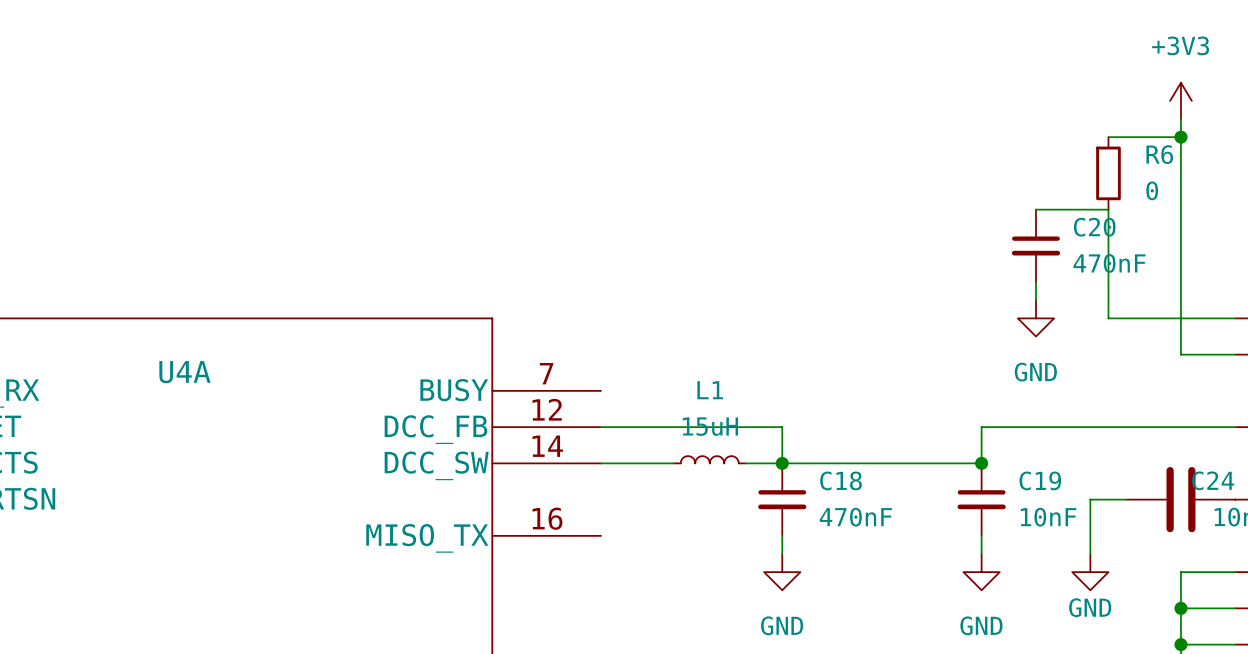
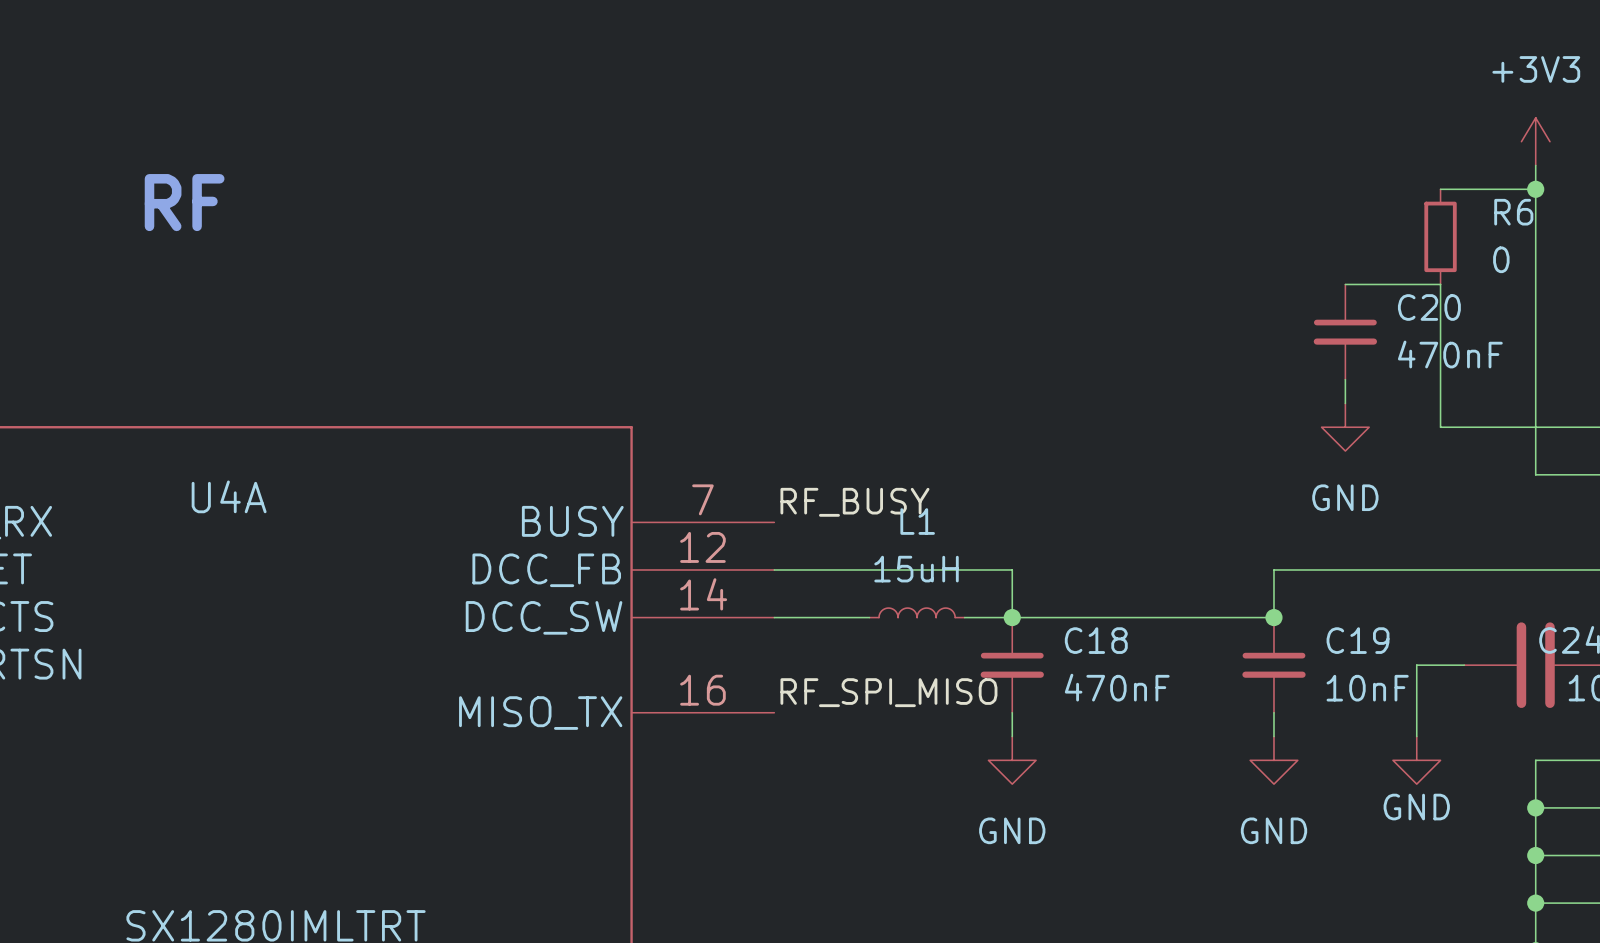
text: none -> RF (184, 202)
label: none -> RF_BUSY (854, 502)
label: none -> RF_SPI_MISO (888, 692)

